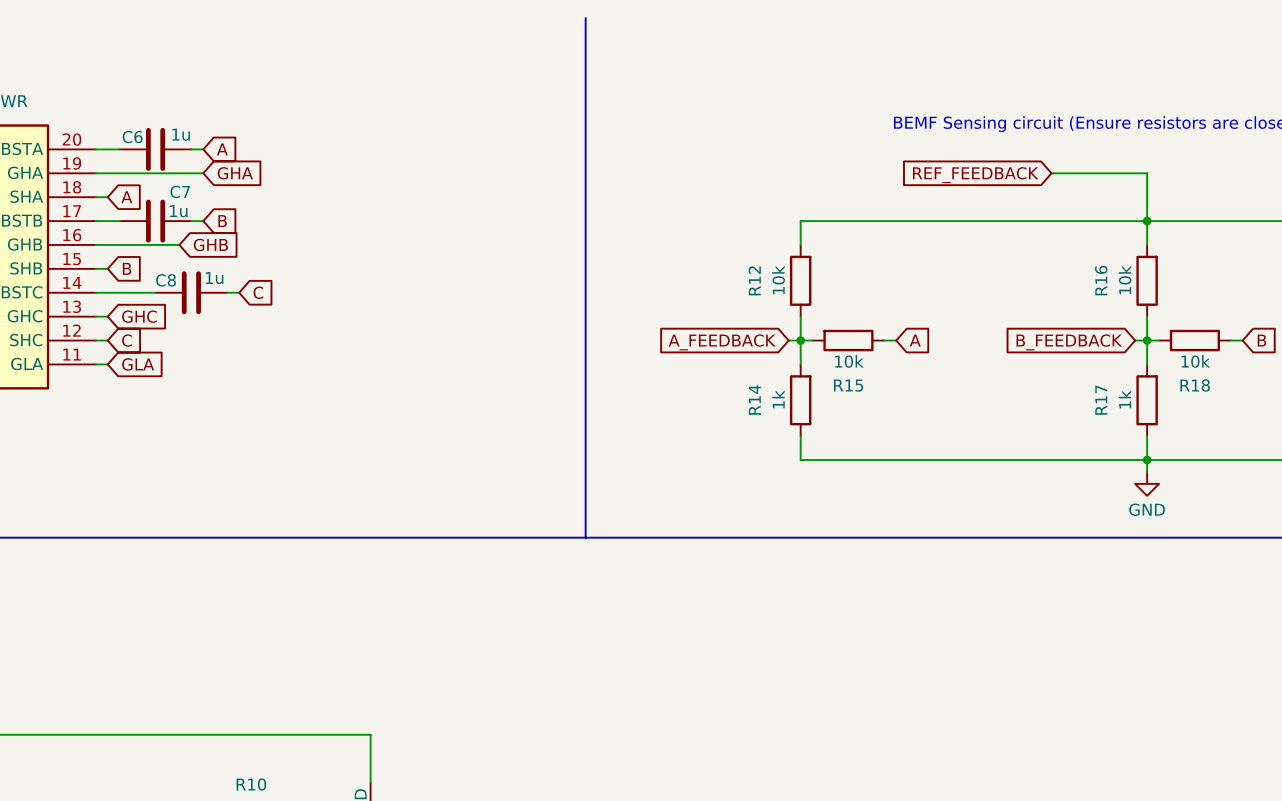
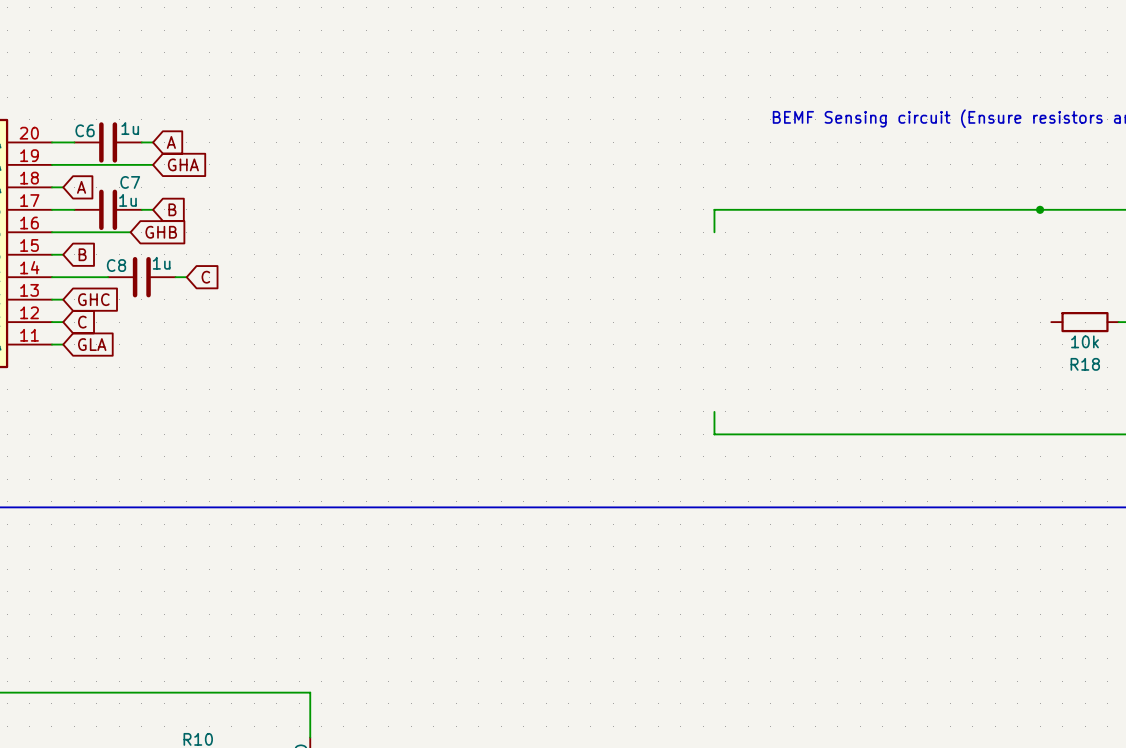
line: (585, 17) (585, 537) -> none
wire: (1051, 173) (1147, 173) (1147, 244) -> none
global label: REF_FEEDBACK (975, 175) -> none
R12: 10k (800, 280) -> none
R16: 10k (1147, 280) -> none
wire: (800, 316) (800, 364) -> none
wire: (1147, 316) (1147, 364) -> none
wire: (788, 340) (812, 340) -> none
junction: (800, 340) -> none
R15: 10k (848, 340) -> none
wire: (884, 340) (896, 340) -> none
global label: A (915, 340) -> none
wire: (1135, 340) (1159, 340) -> none
junction: (1147, 340) -> none
global label: A_FEEDBACK (722, 342) -> none
global label: B_FEEDBACK (1069, 342) -> none
R14: 1k (800, 400) -> none
R17: 1k (1147, 400) -> none
wire: (1147, 436) (1147, 471) -> none
junction: (1147, 460) -> none
power symbol: GND (1147, 483) -> none

